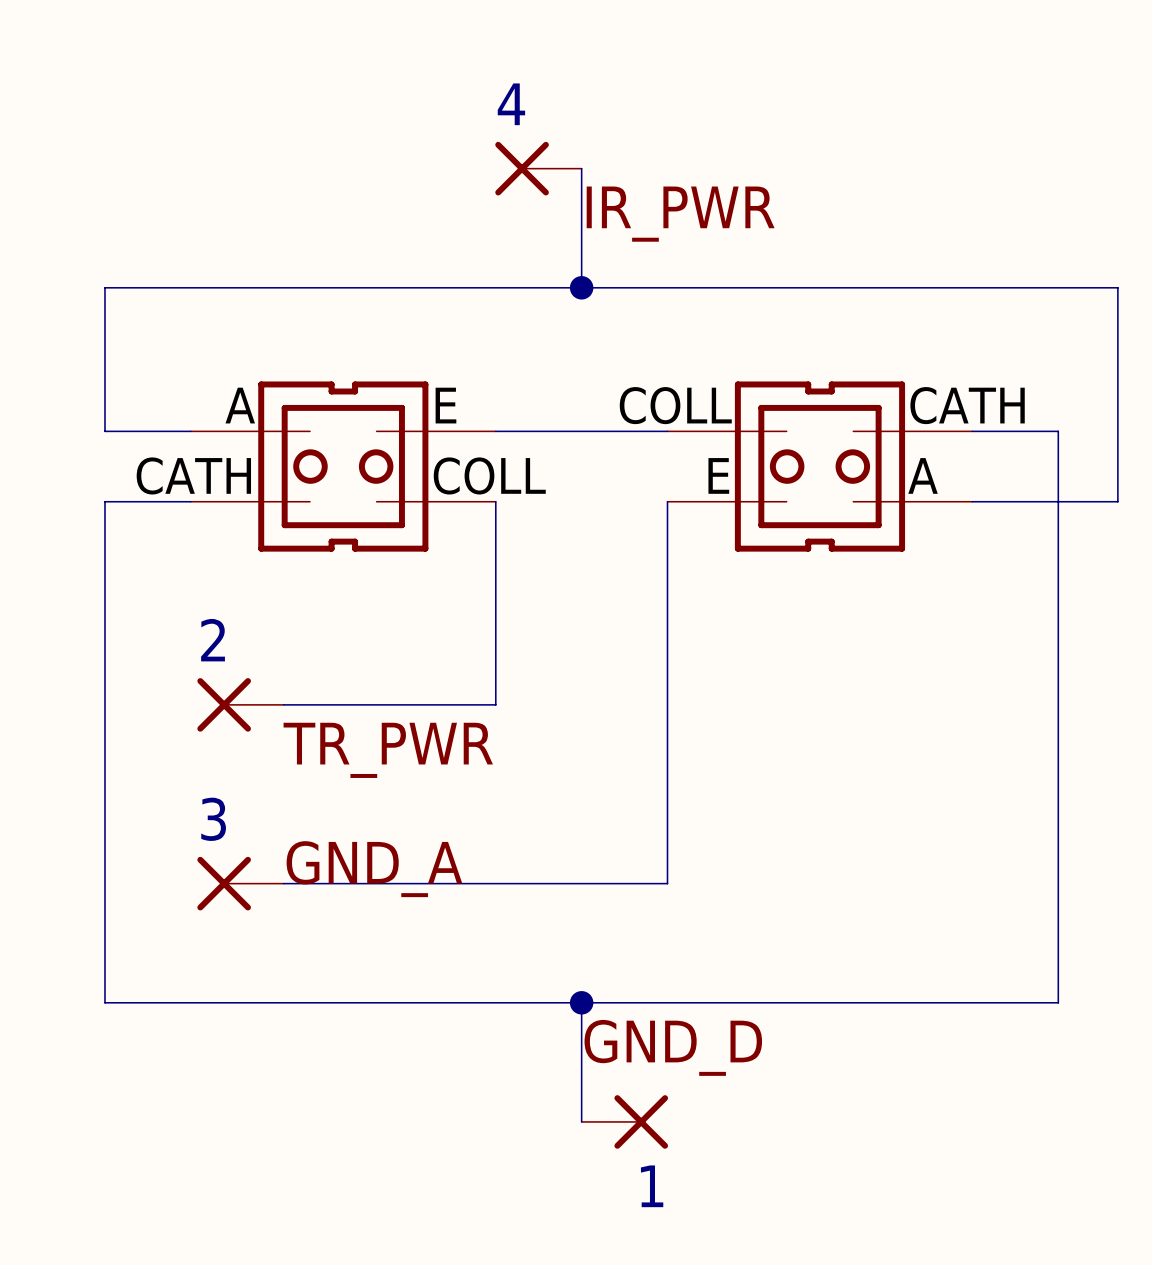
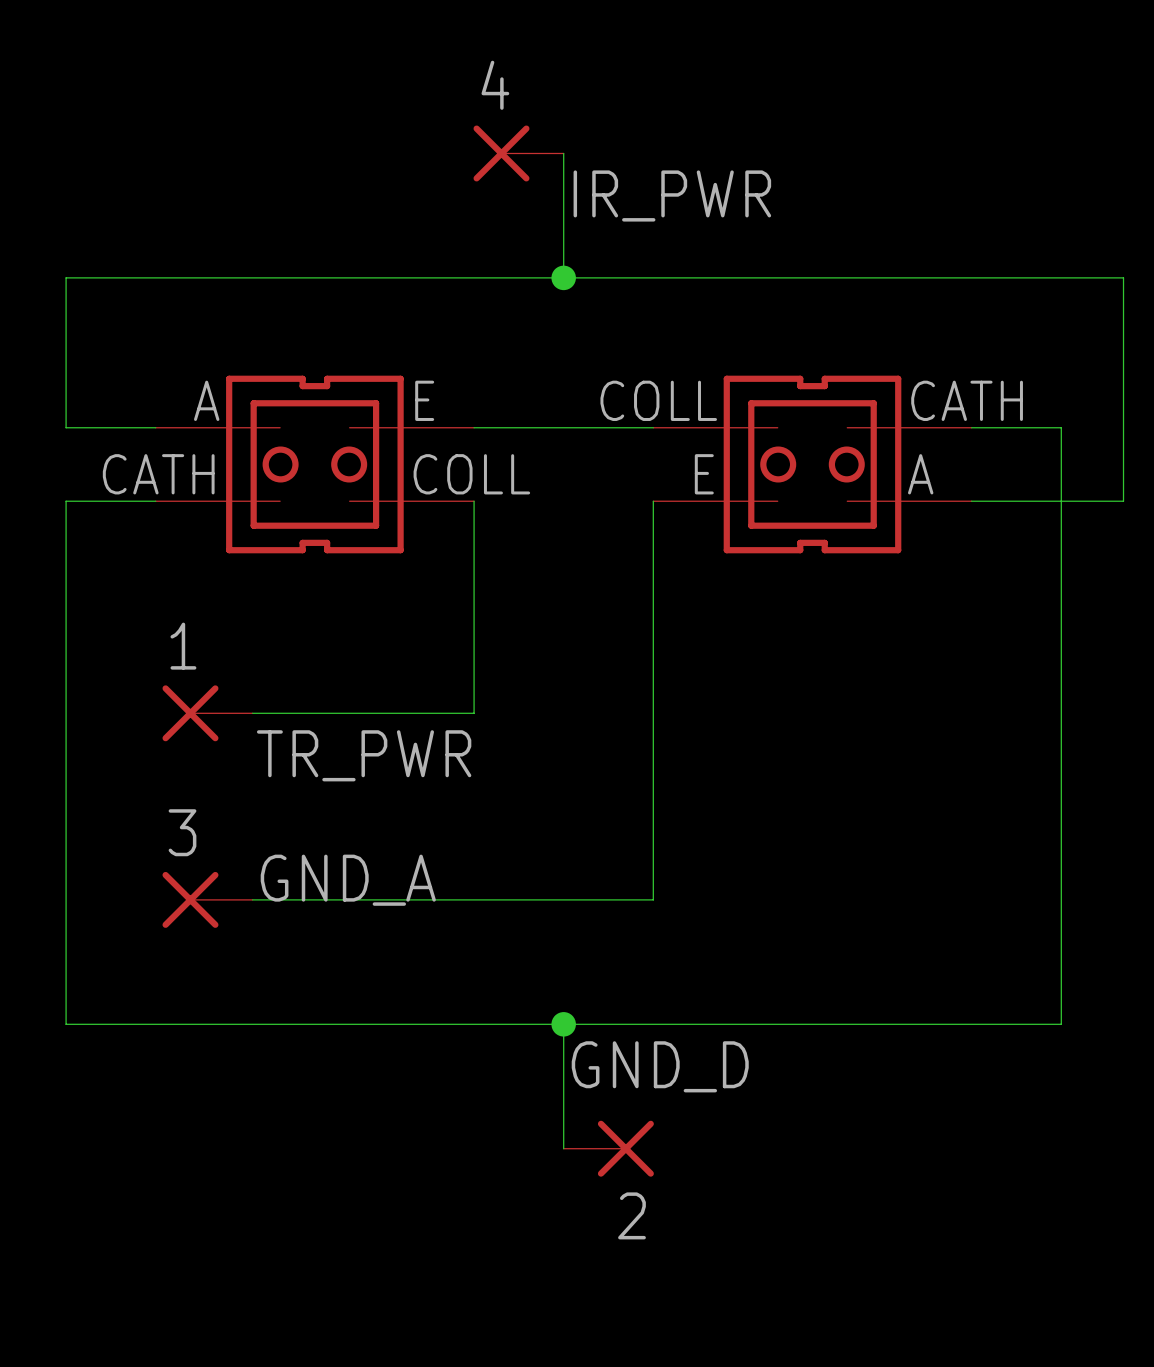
2 name: 2 (213, 640) -> 1 (183, 646)
1 name: 1 (652, 1186) -> 2 (632, 1215)

